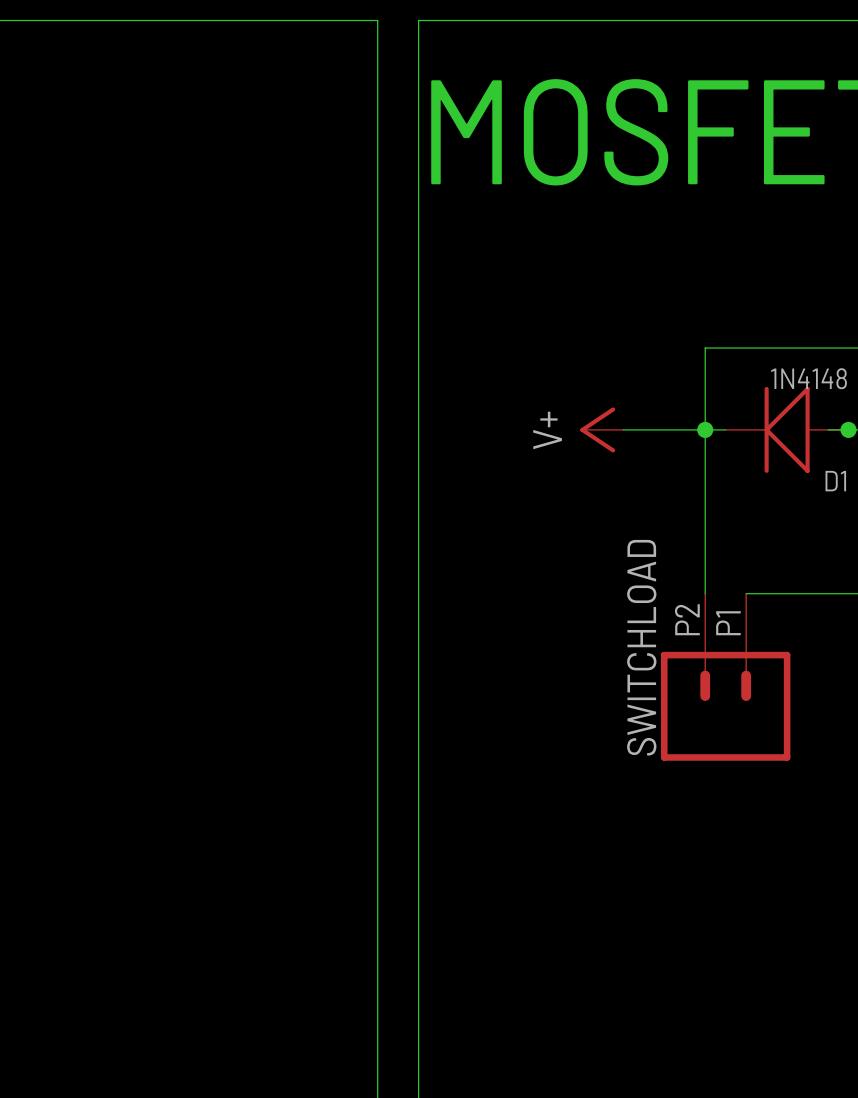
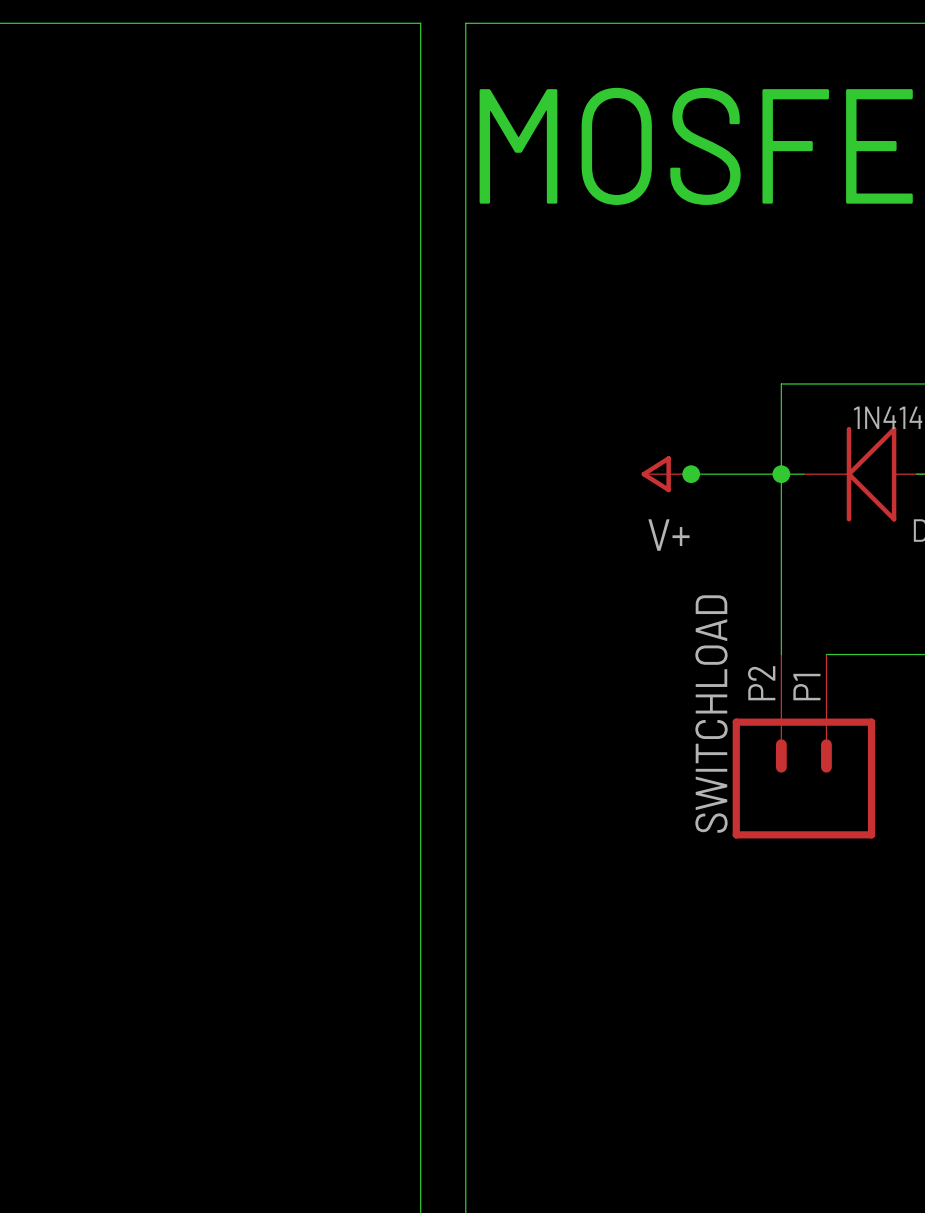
power symbol shape: [580, 407, 624, 453] -> [641, 456, 692, 493]
junction: none -> (691, 474)
power symbol text rotation: 0° (547, 430) -> 90° clockwise (669, 535)
power symbol text position: V+ (547, 430) -> V+ (669, 535)

